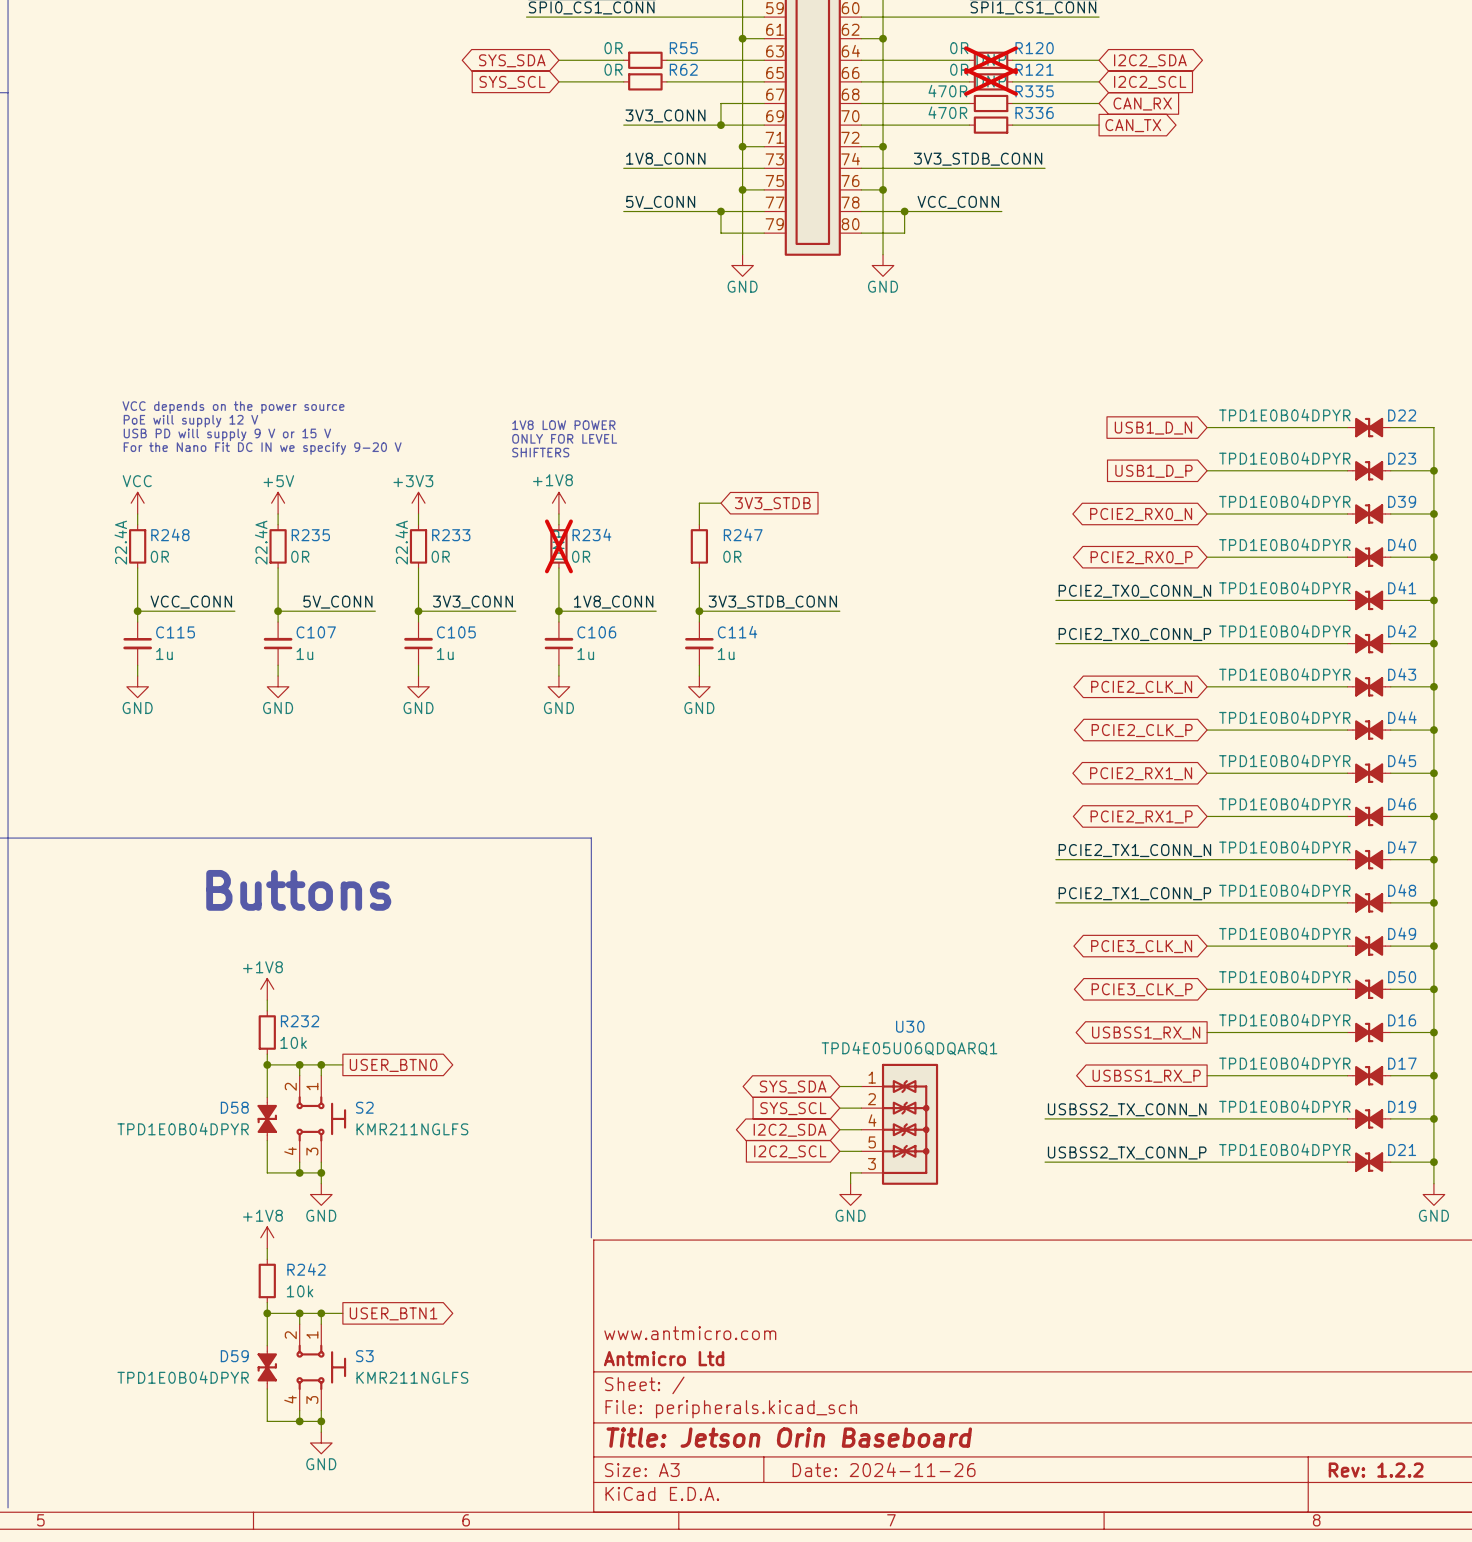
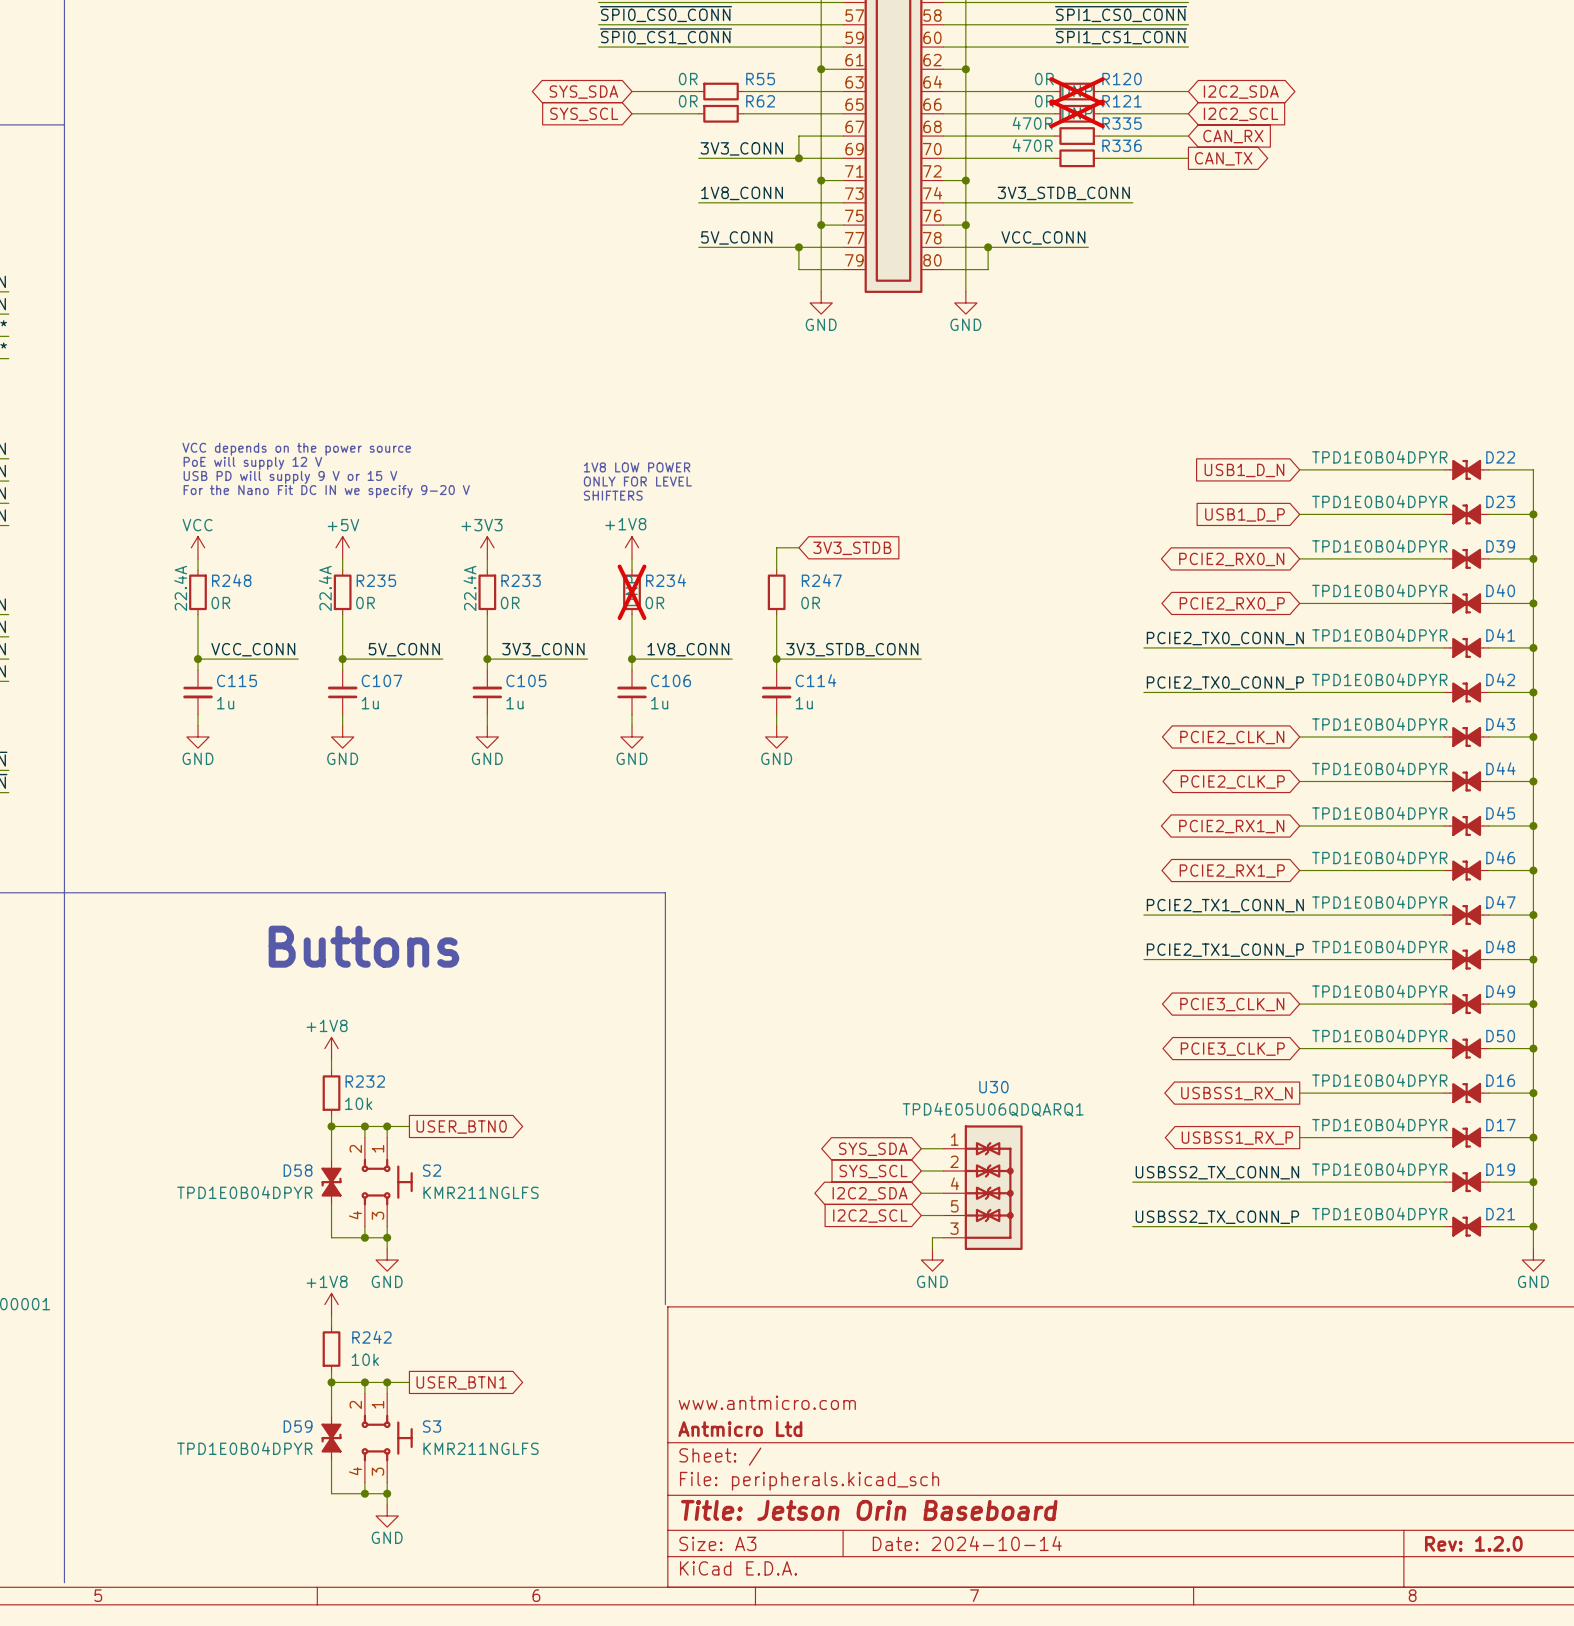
title block: Date: 2024-11-26 (884, 1469) -> Date: 2024-10-14 (967, 1543)
title block: Rev: 1.2.2 (1376, 1470) -> Rev: 1.2.0 (1473, 1543)

